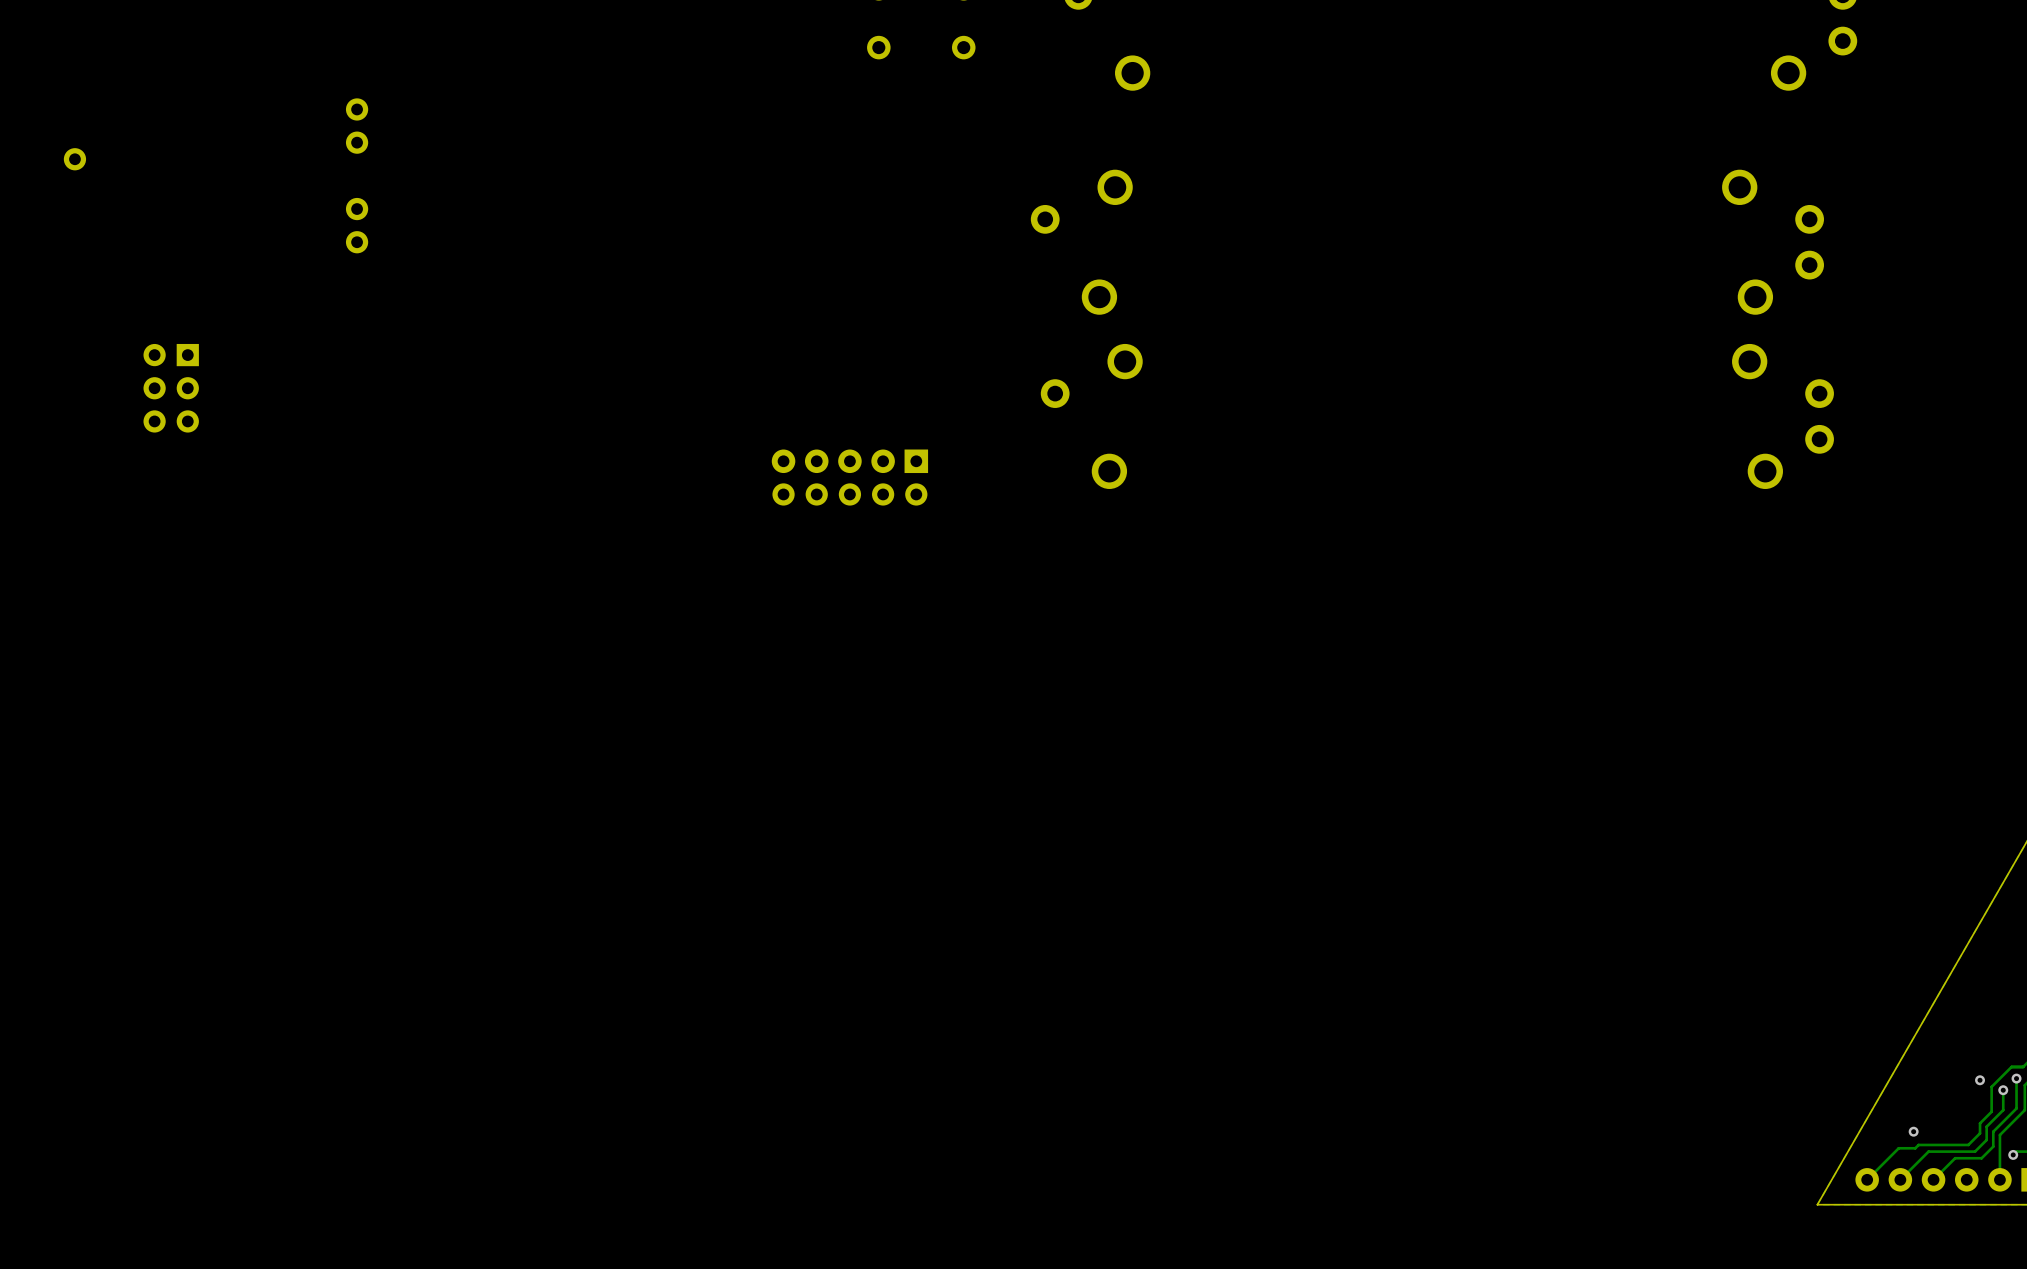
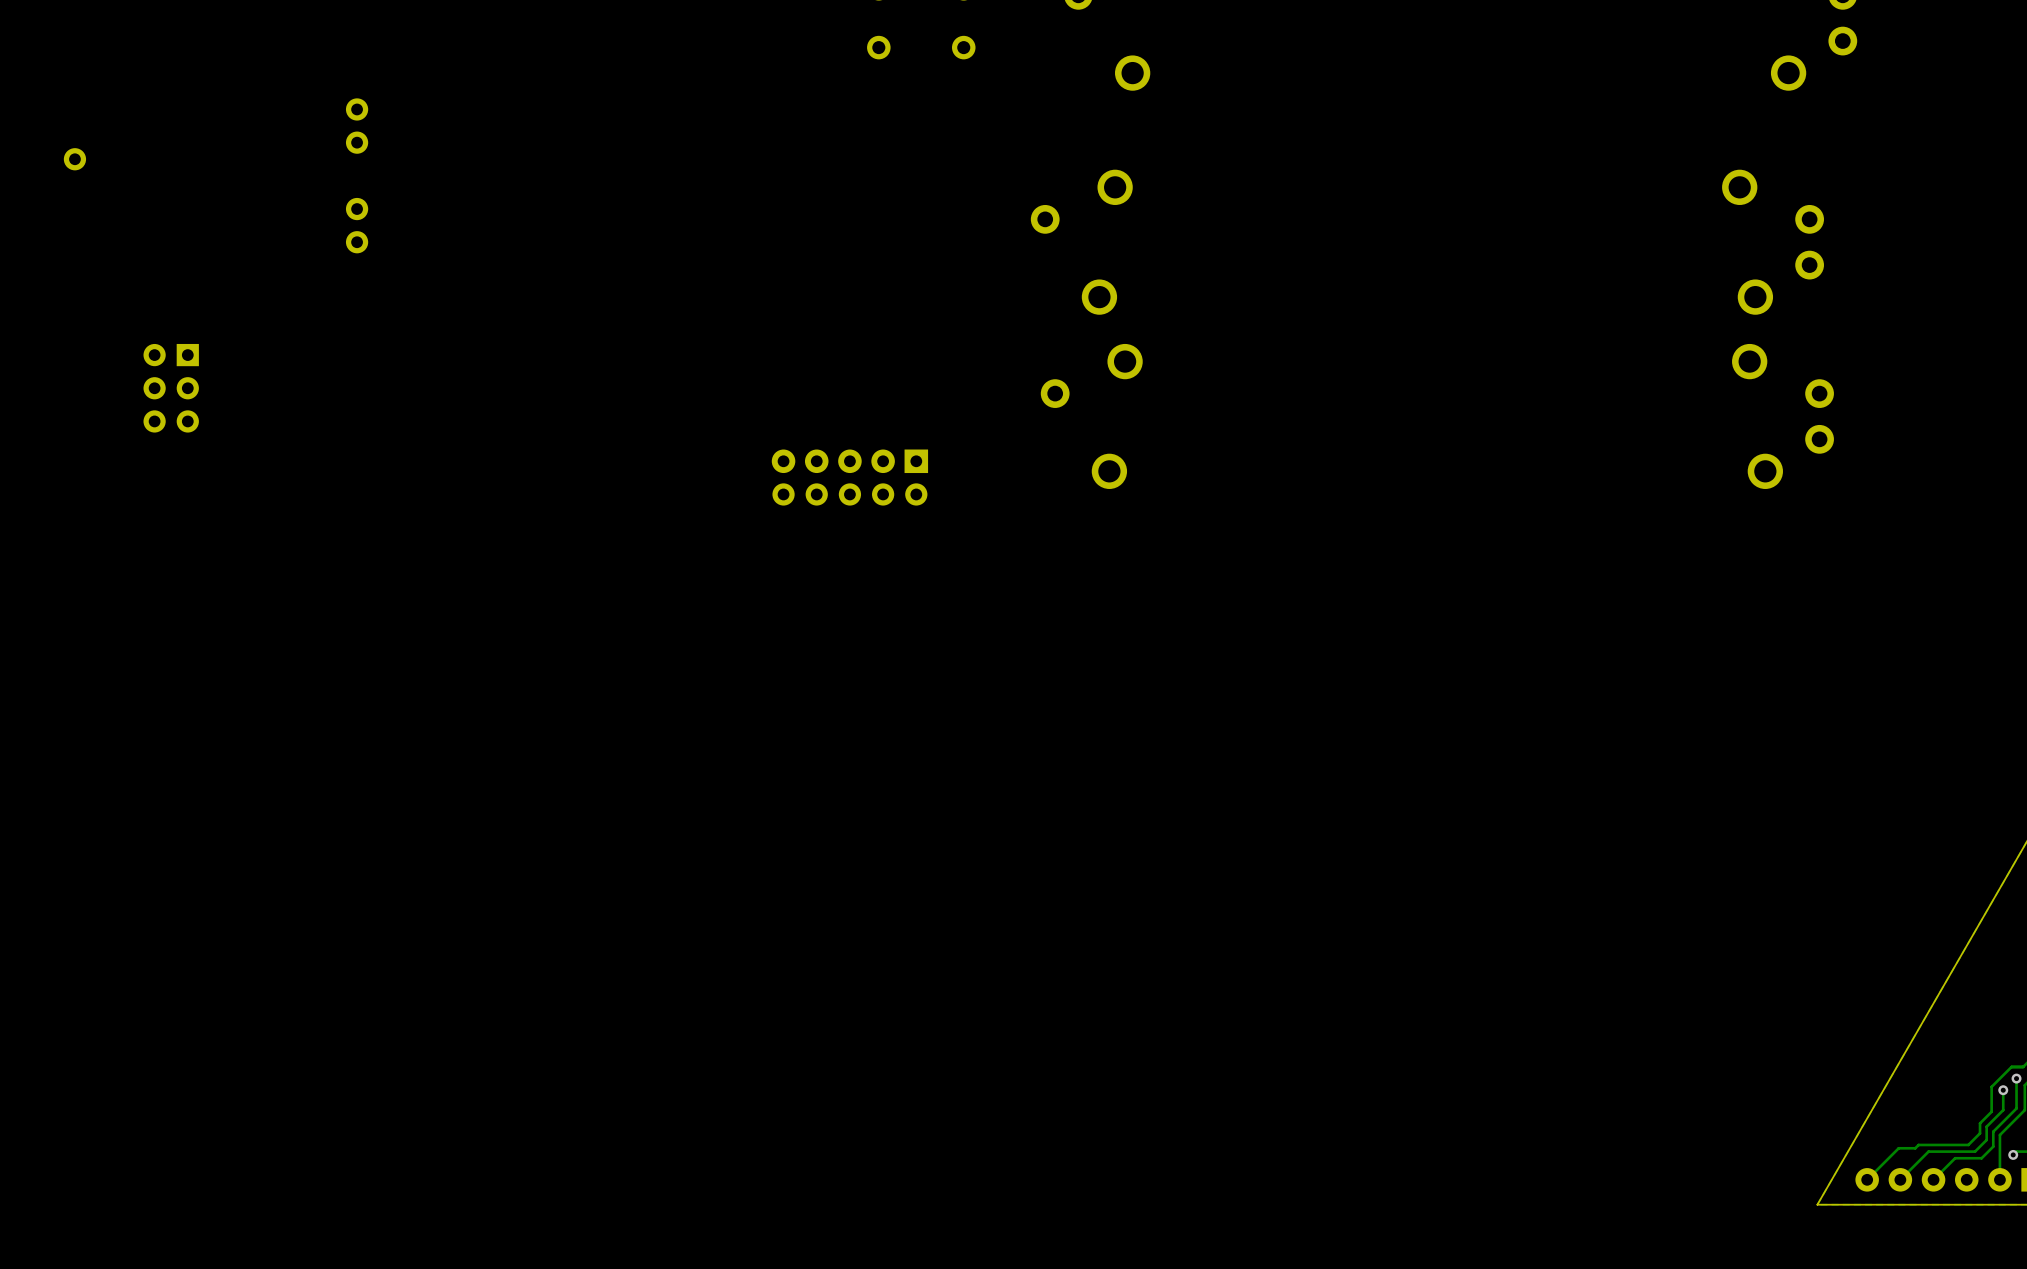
via: (1980, 1080) -> none
via: (1913, 1131) -> none

